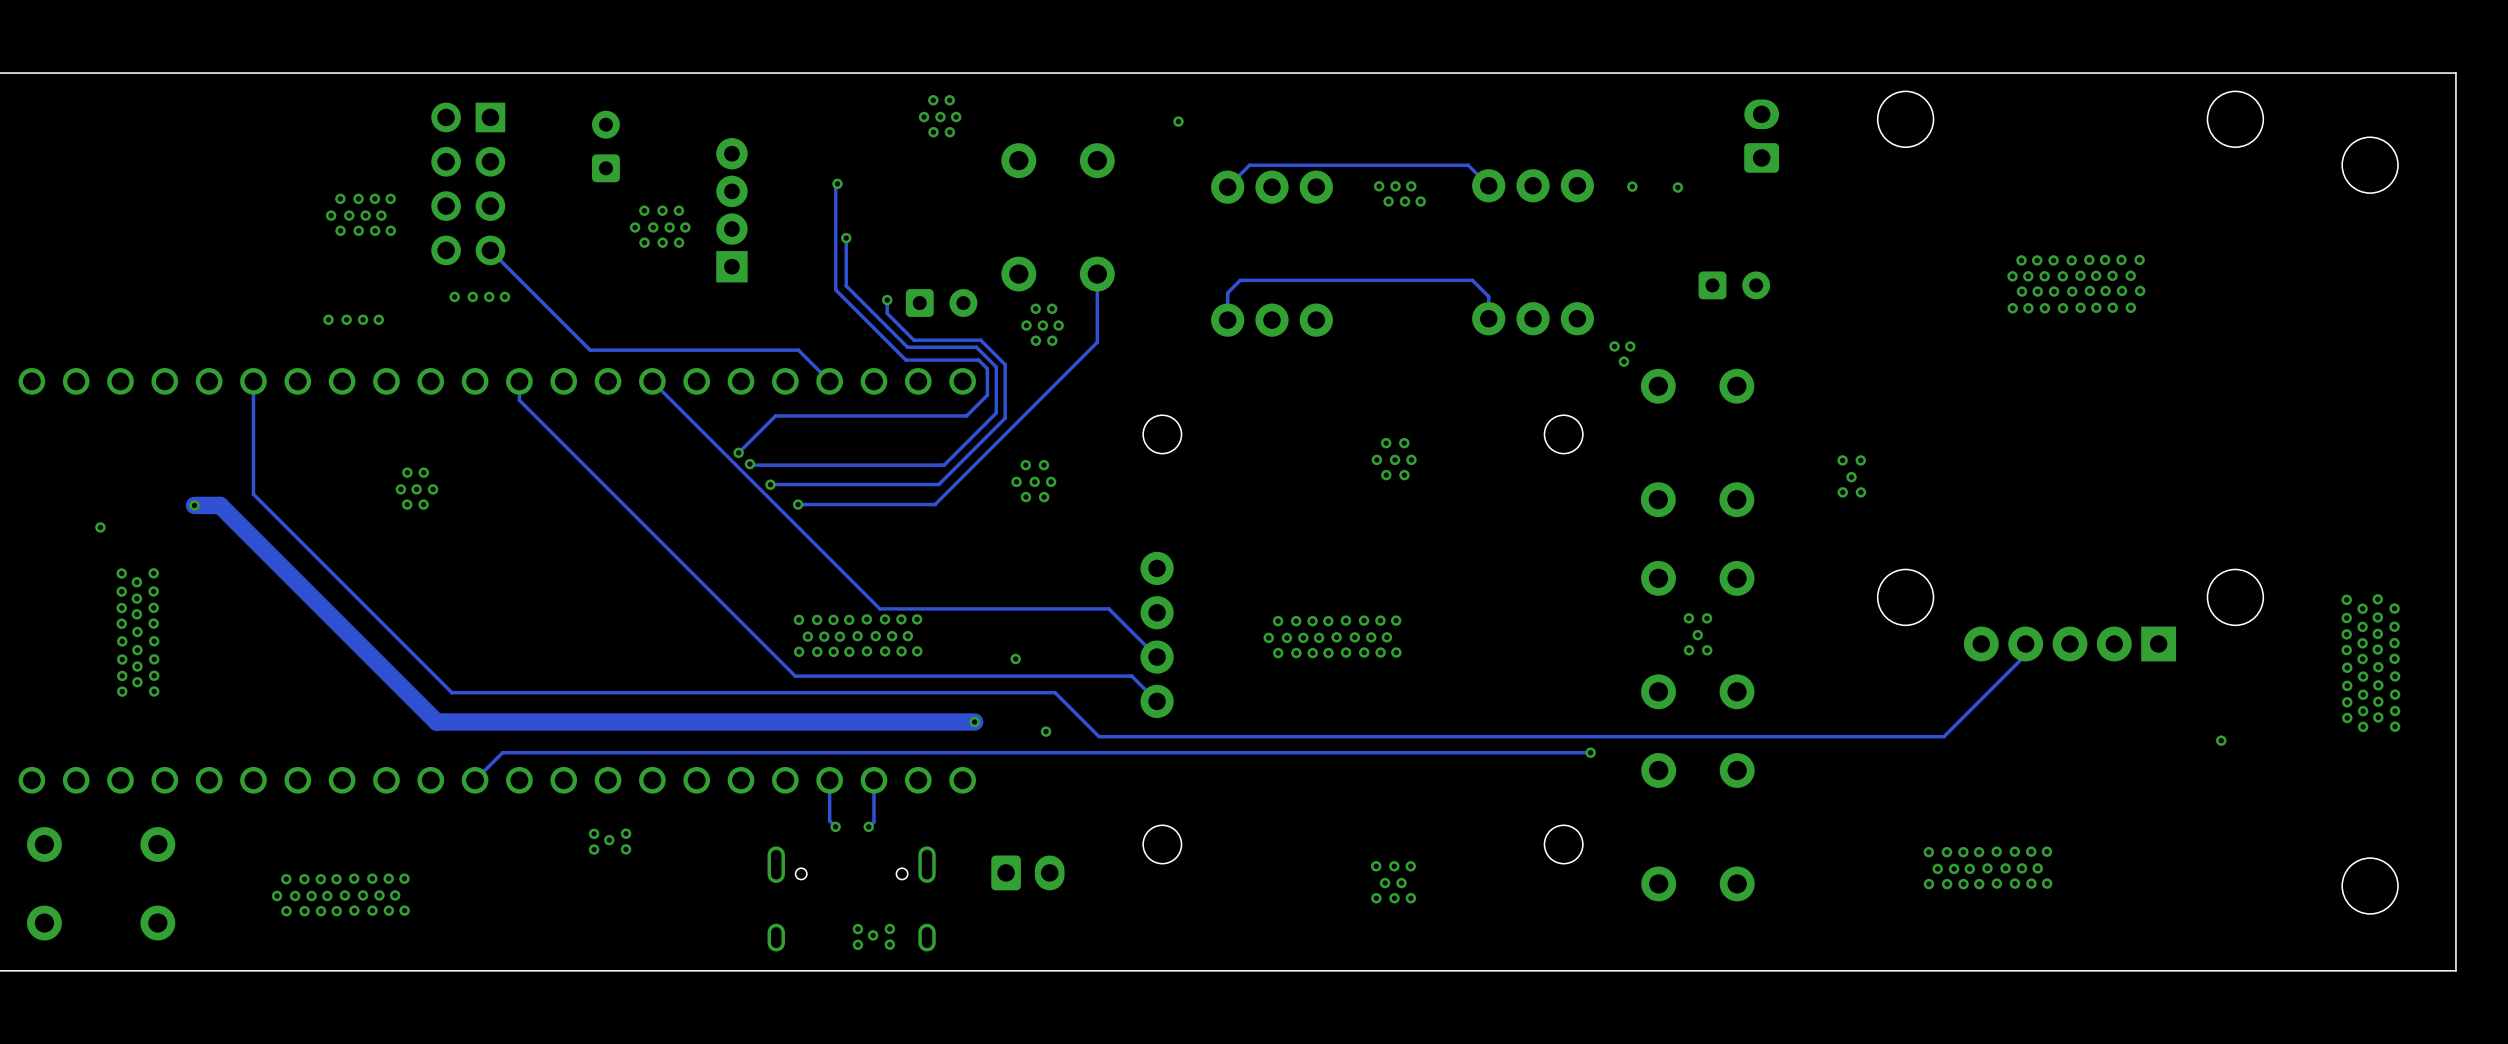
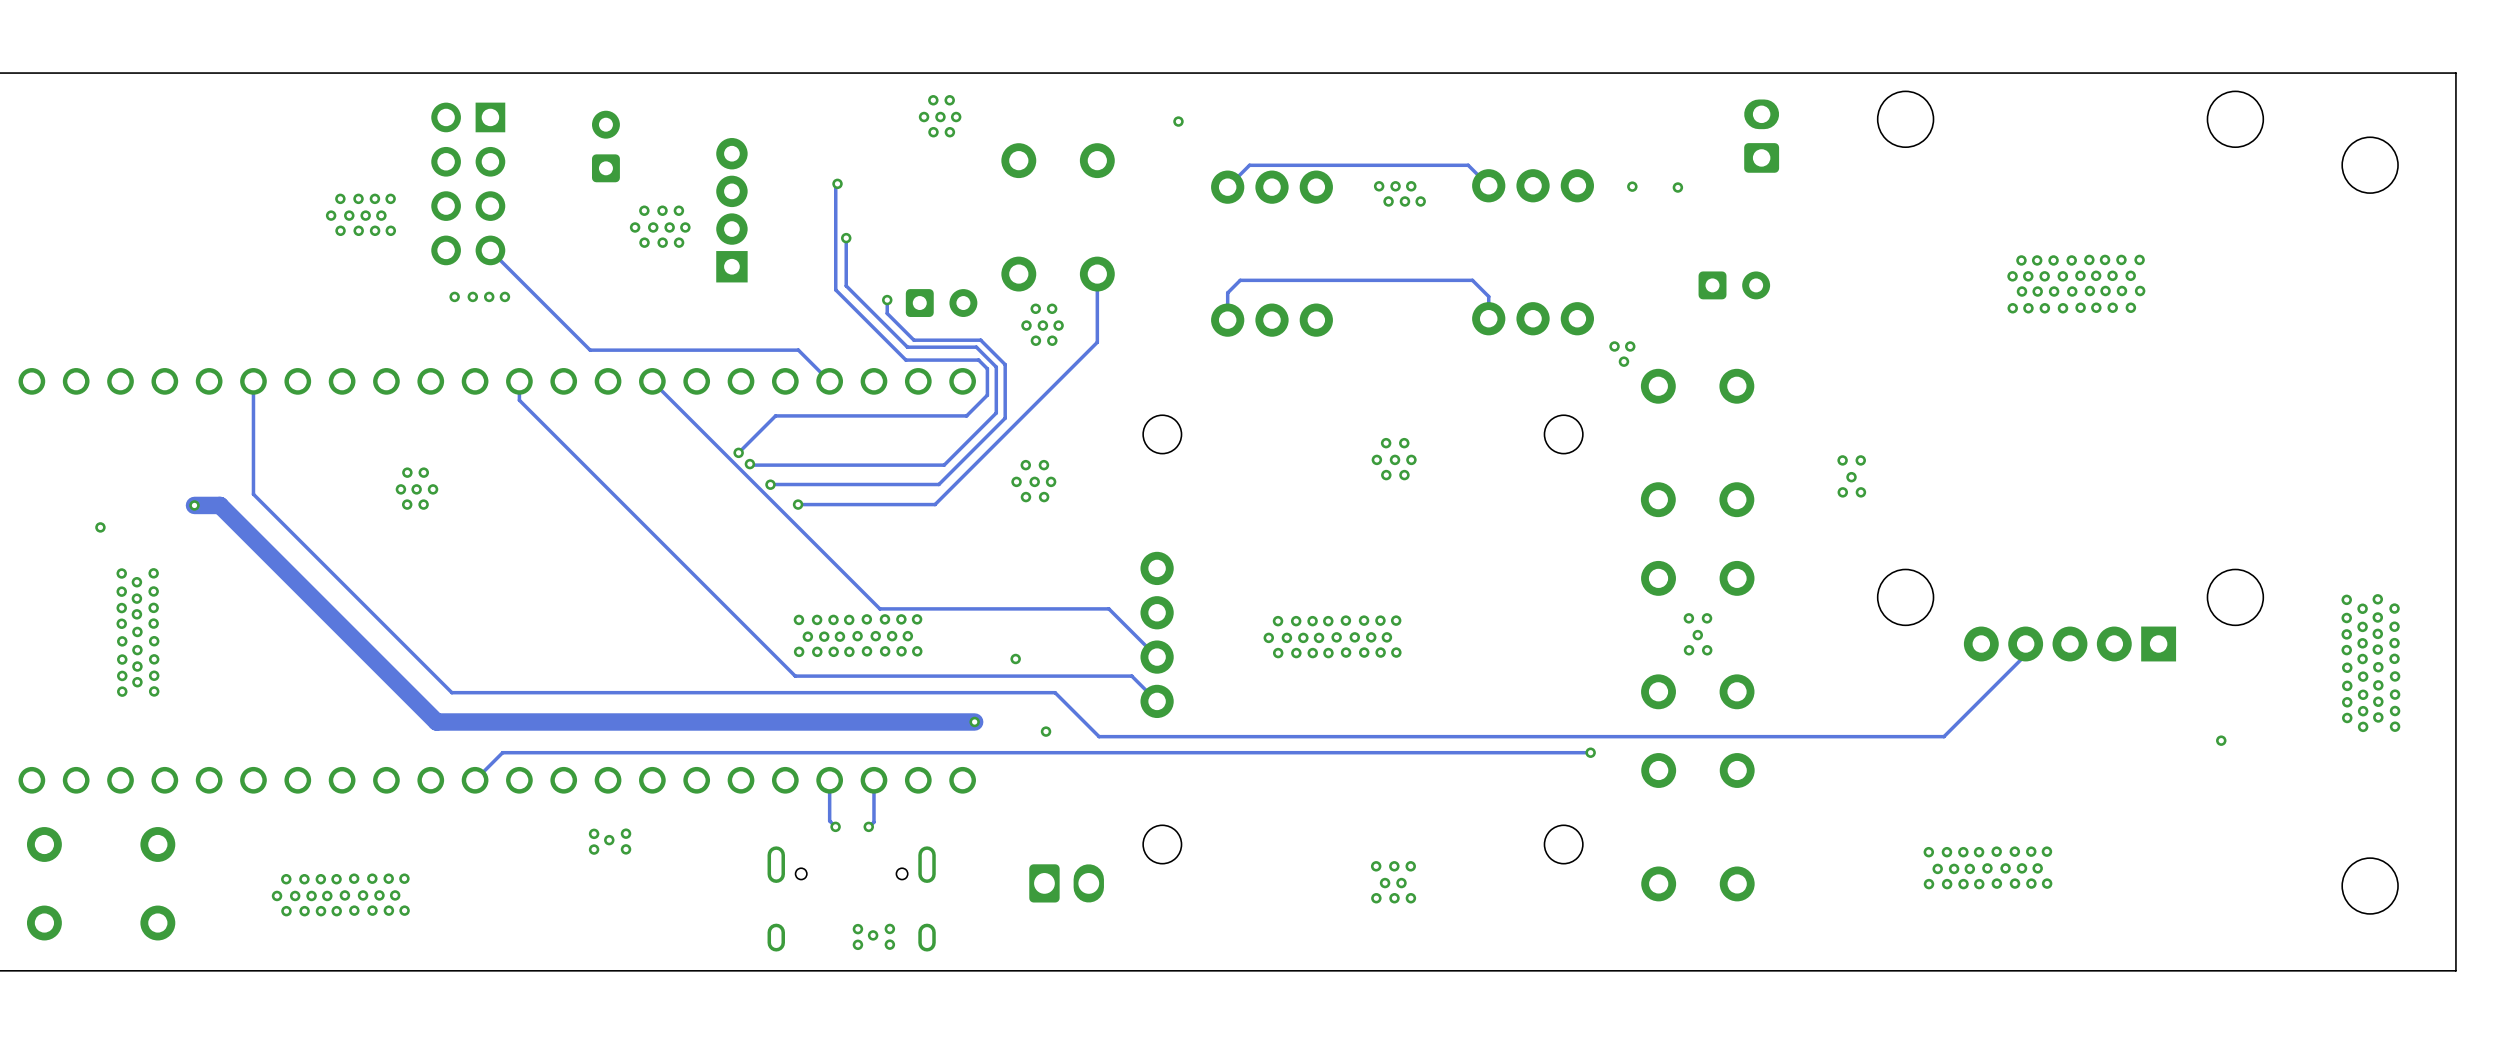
via: (328, 319) -> none
via: (346, 319) -> none
via: (363, 319) -> none
via: (378, 319) -> none
part: (1027, 872) -> none
part: none -> (1066, 883)

